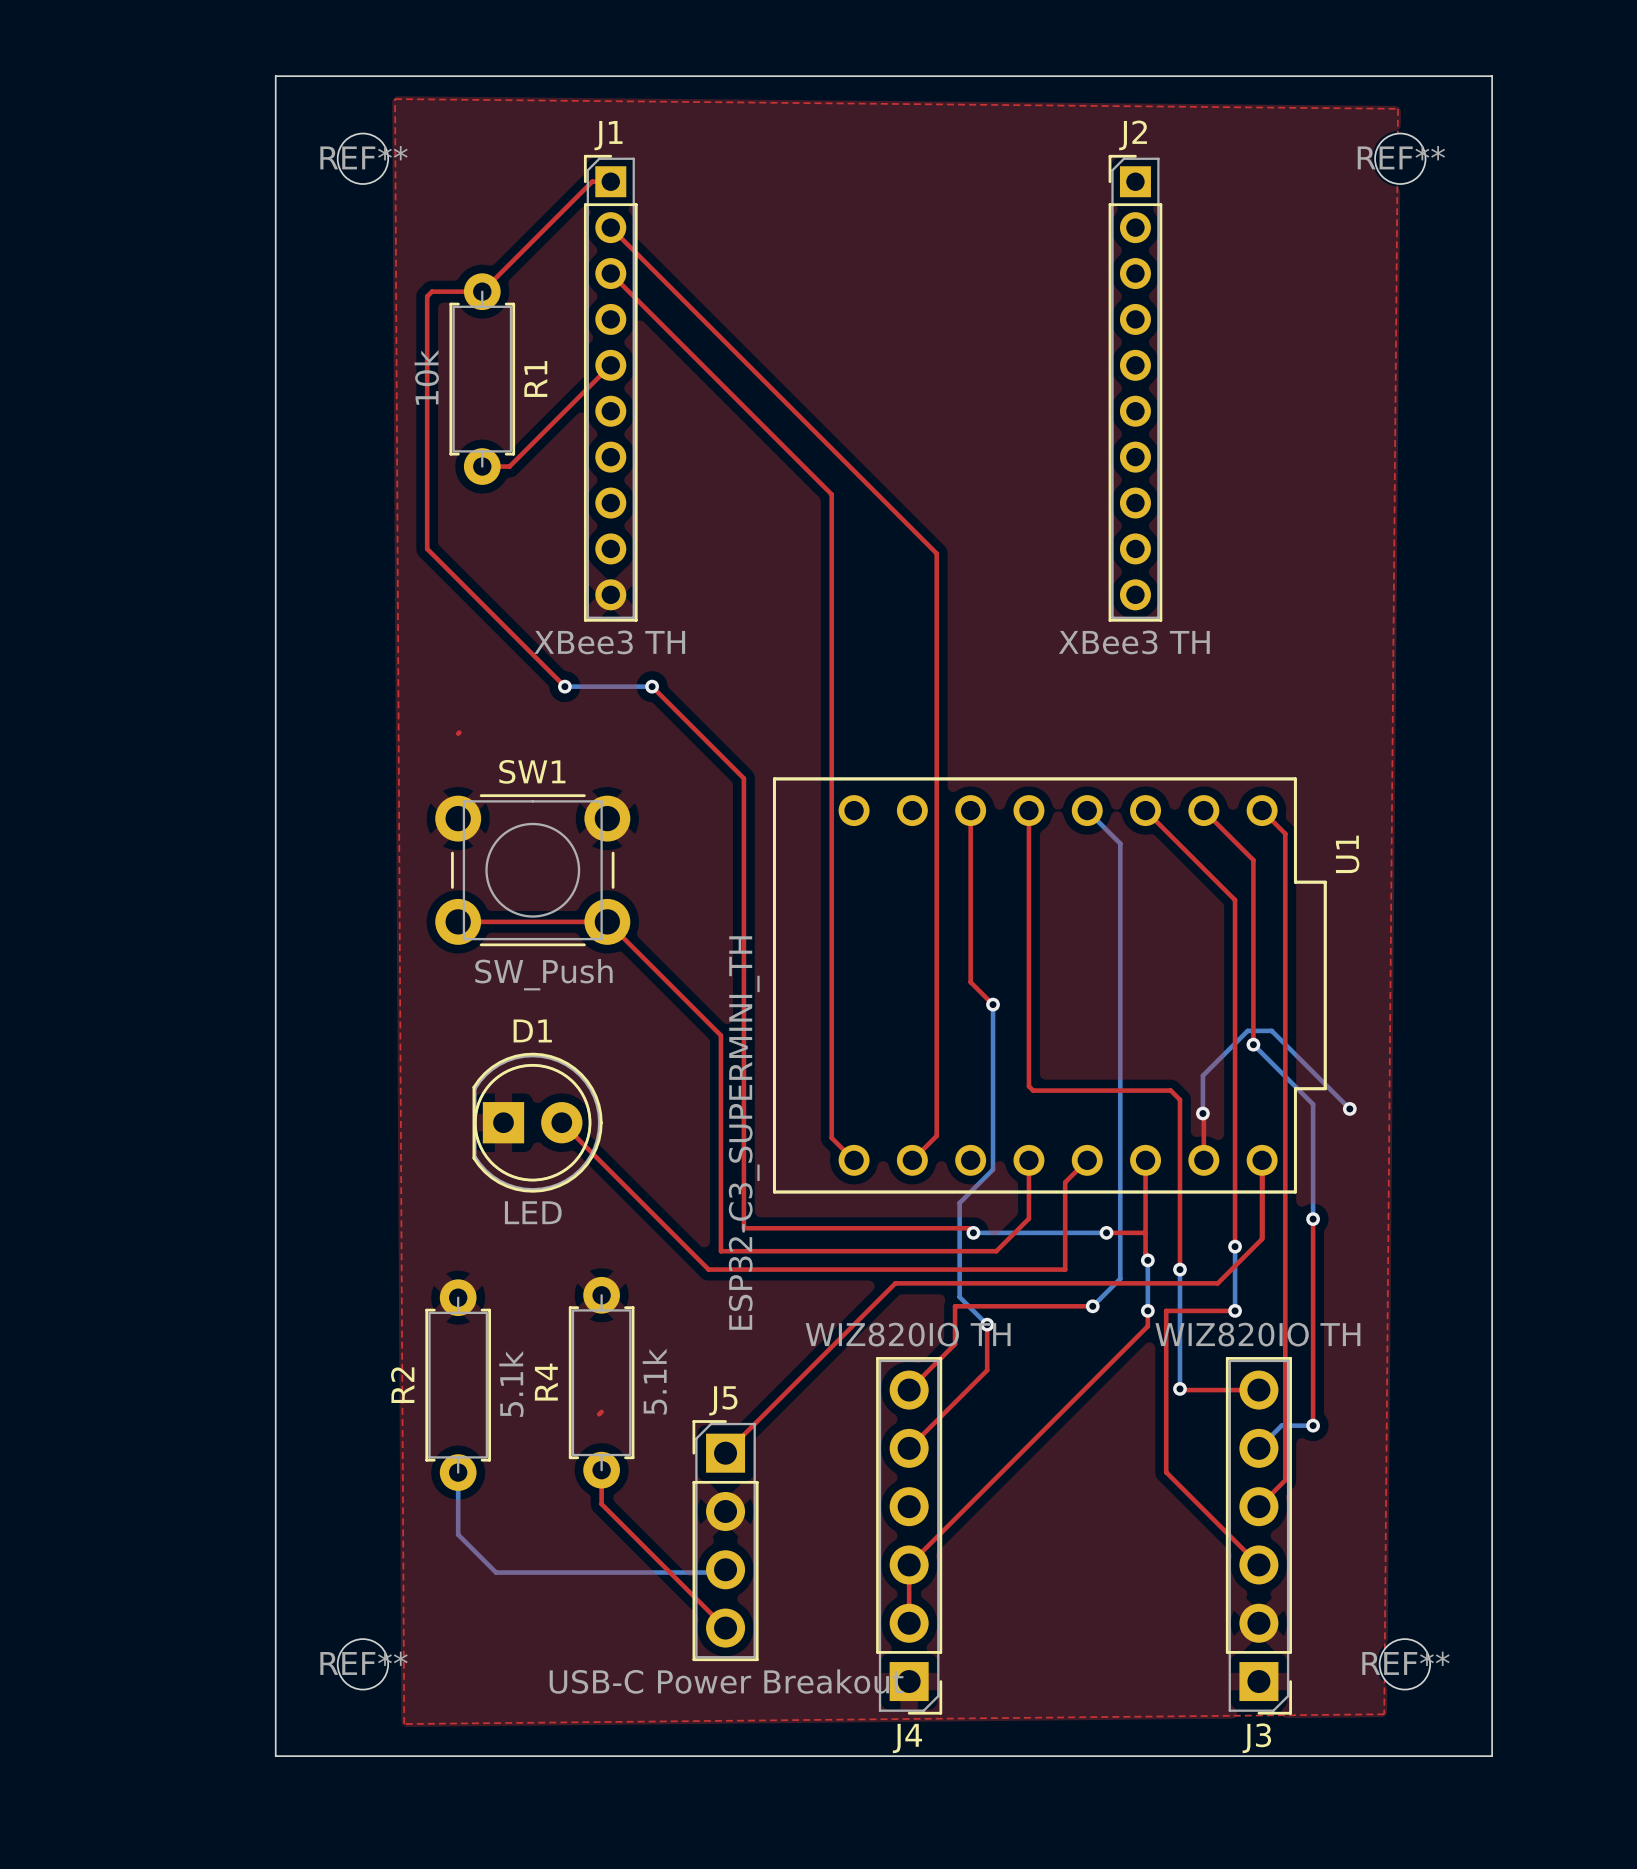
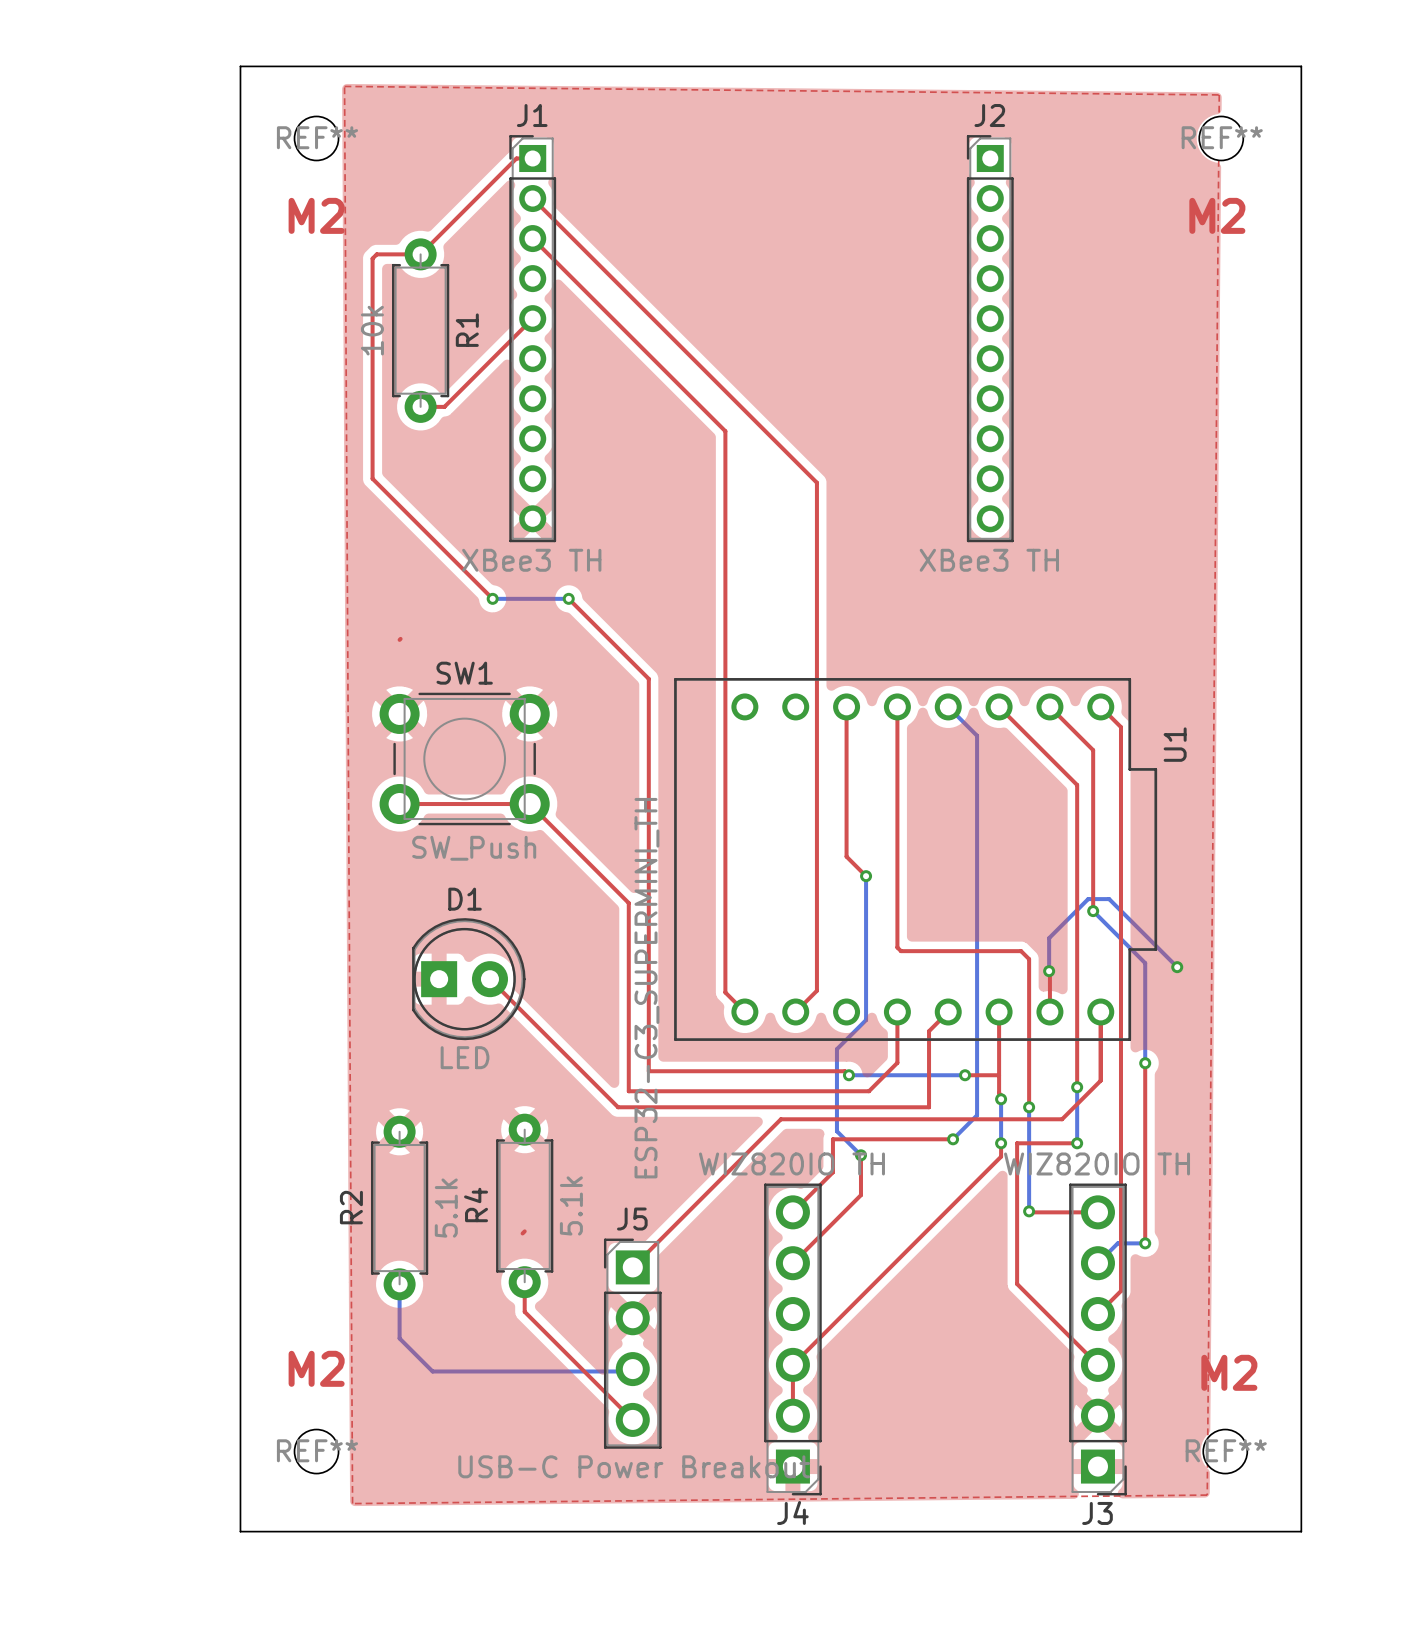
text: none -> M2 (316, 215)
text: none -> M2 (1217, 215)
text: none -> M2 (316, 1368)
text: none -> M2 (1229, 1372)

